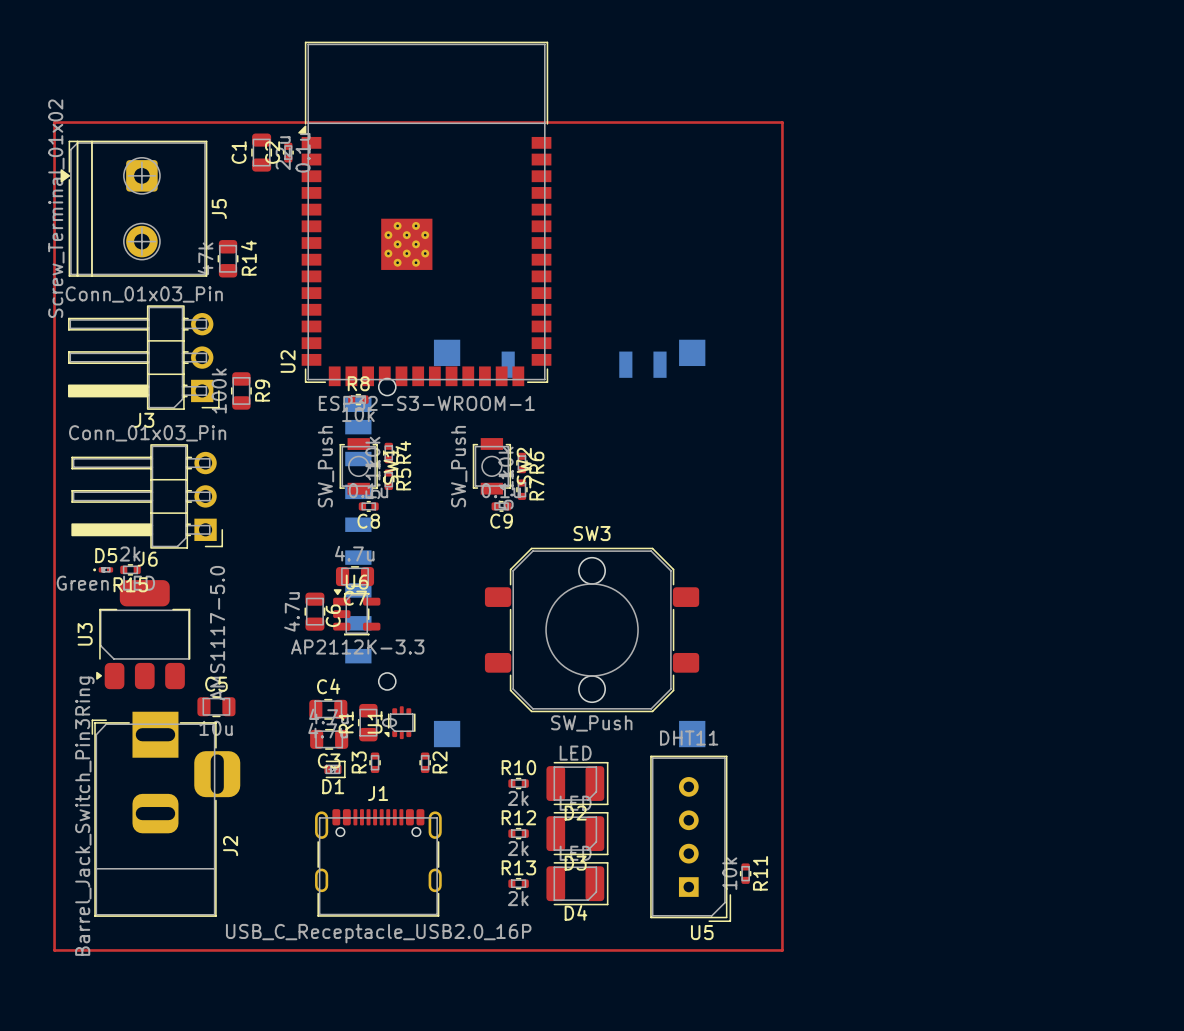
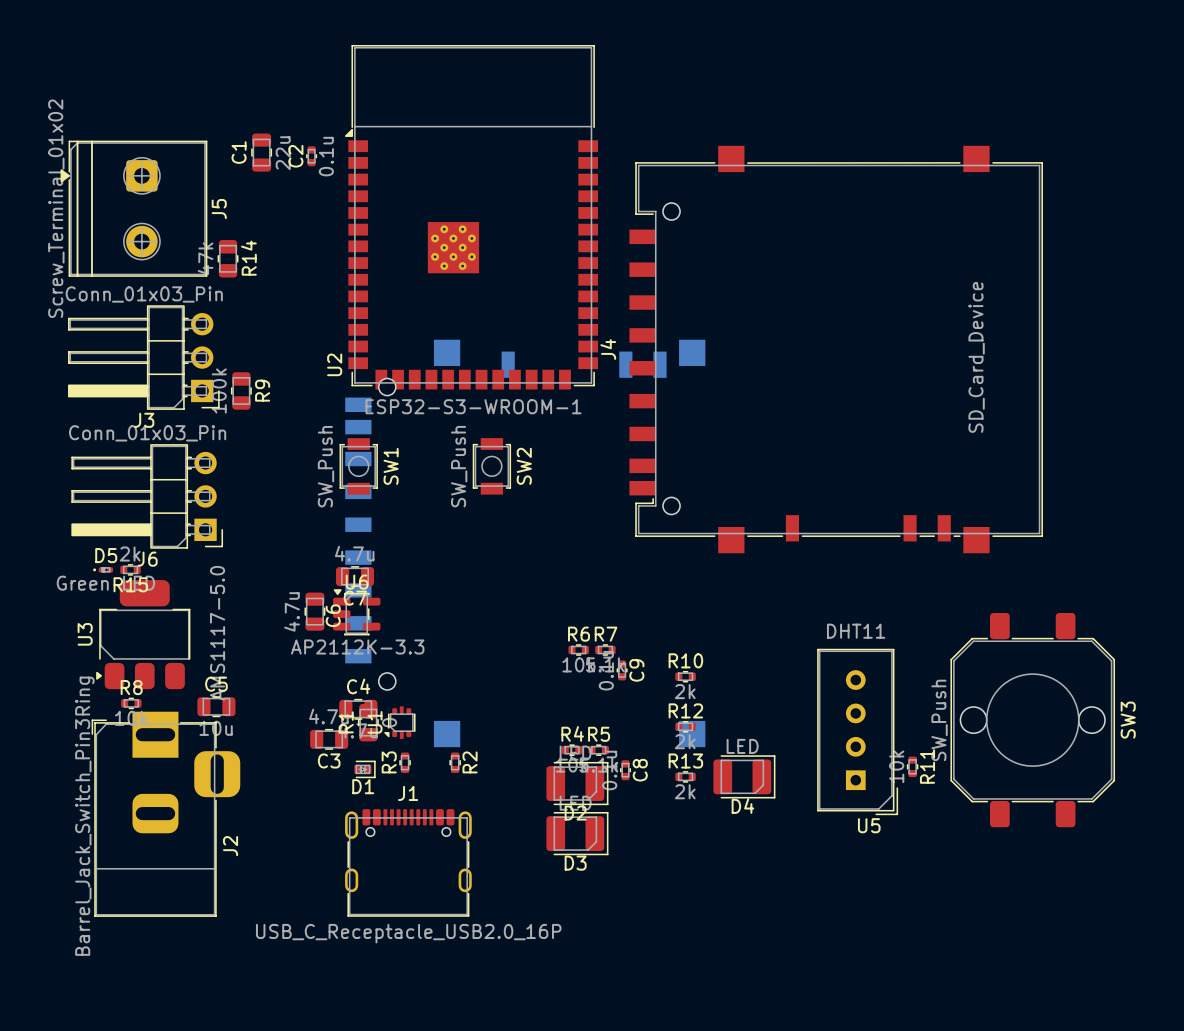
top track: (54, 122) (782, 122) (782, 950) (54, 950) (54, 122) -> none
C2 position: (288, 152) -> (311, 156)
U2 position: (424, 213) -> (471, 217)
J4: none -> SD_Card_Device (836, 349)
R8 position: (358, 399) -> (131, 703)
R4 rotation: 0° (388, 453) -> 90° clockwise (572, 750)
R4 position: (388, 453) -> (572, 750)
R6 rotation: 0° (521, 462) -> 90° clockwise (578, 650)
R6 position: (521, 462) -> (578, 650)
R5 rotation: 0° (388, 479) -> 90° clockwise (598, 750)
R5 position: (388, 479) -> (598, 750)
R7 rotation: 0° (521, 489) -> 90° clockwise (605, 650)
R7 position: (521, 489) -> (605, 650)
C8 rotation: 0° (368, 506) -> 90° clockwise (625, 770)
C8 position: (368, 506) -> (625, 770)
C9 rotation: 0° (501, 506) -> 90° clockwise (622, 670)
C9 position: (501, 506) -> (622, 670)
SW3 rotation: 0° (592, 629) -> 90° clockwise (1032, 720)
SW3 position: (592, 629) -> (1032, 720)
C4 position: (328, 709) -> (358, 709)
R3 position: (375, 762) -> (405, 762)
R2 position: (425, 762) -> (455, 762)
D1 position: (335, 769) -> (365, 769)
R10 position: (518, 783) -> (685, 676)
R12 position: (518, 833) -> (685, 726)
U5 position: (690, 838) -> (857, 731)
J1 position: (378, 862) -> (408, 862)
R11 position: (745, 873) -> (912, 766)
R13 position: (518, 883) -> (685, 776)
D4 position: (577, 883) -> (744, 776)

